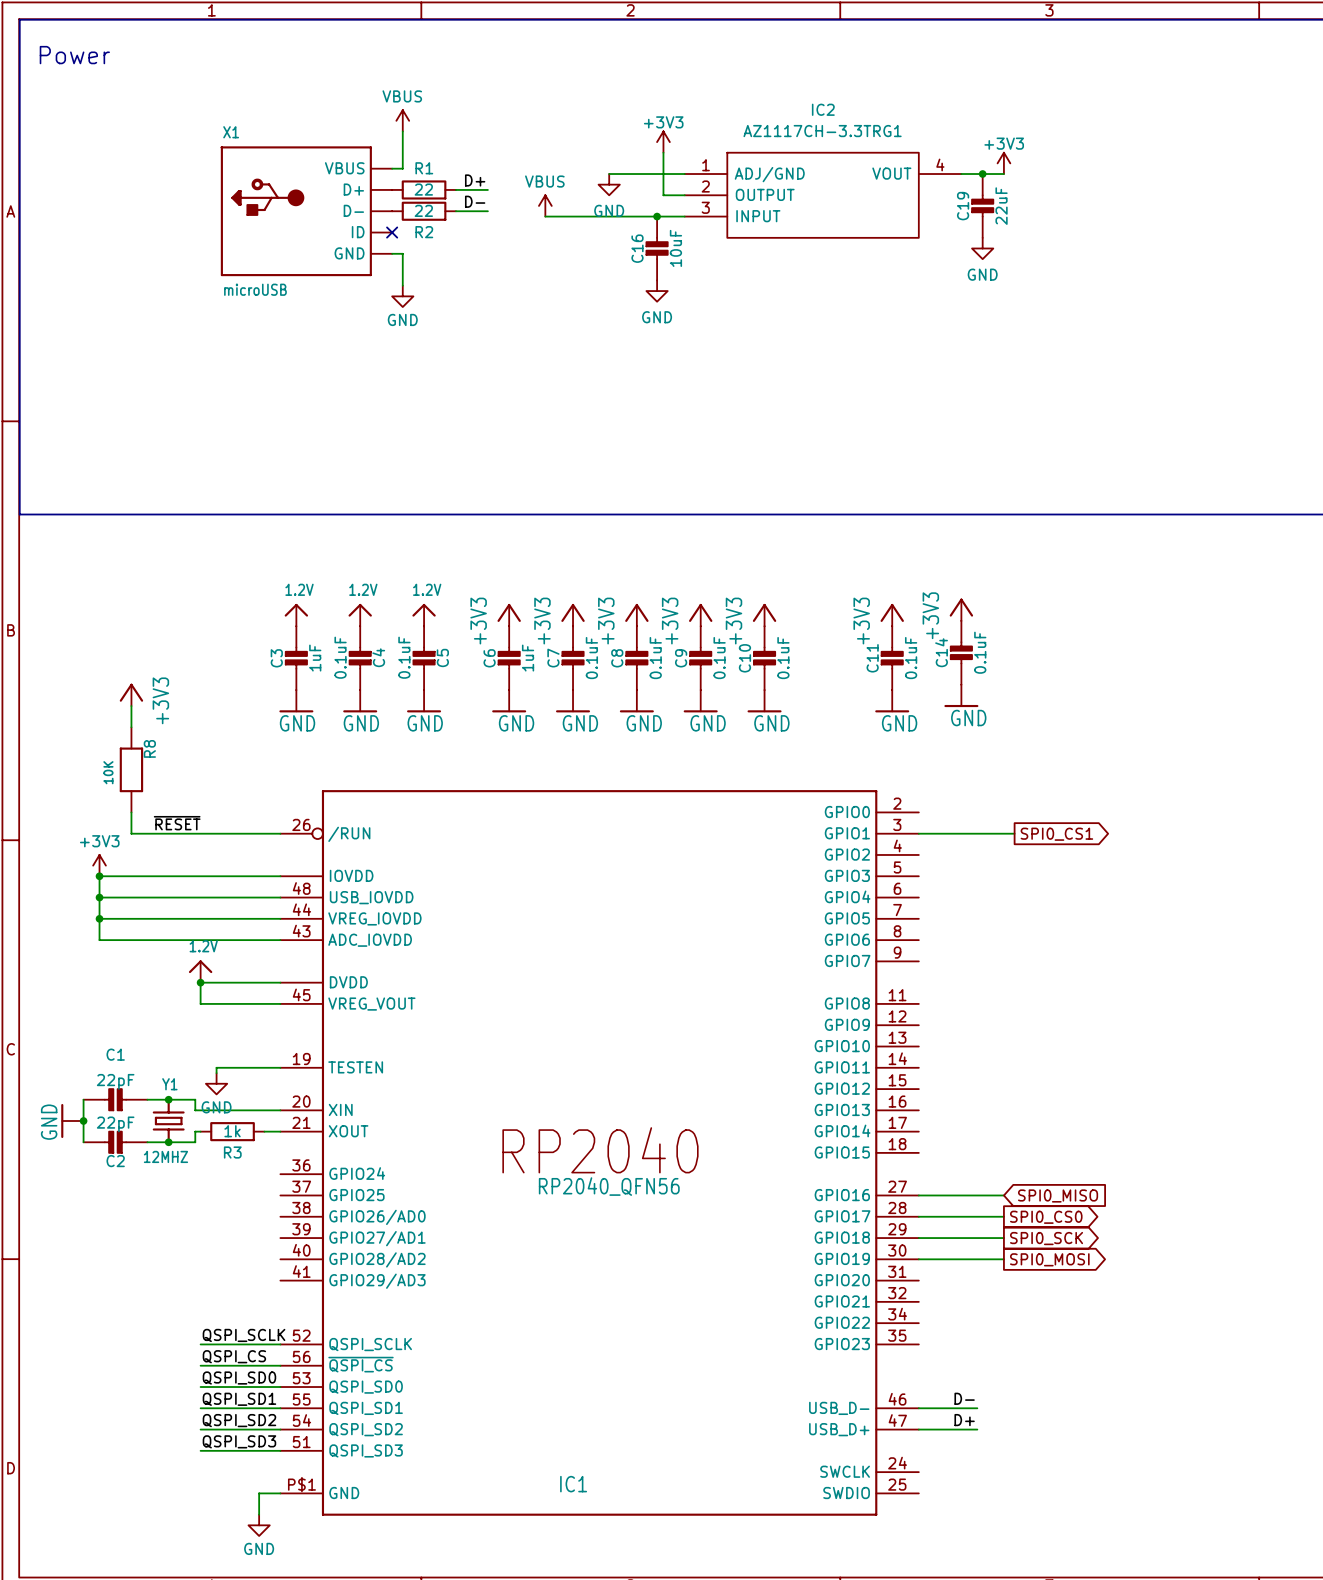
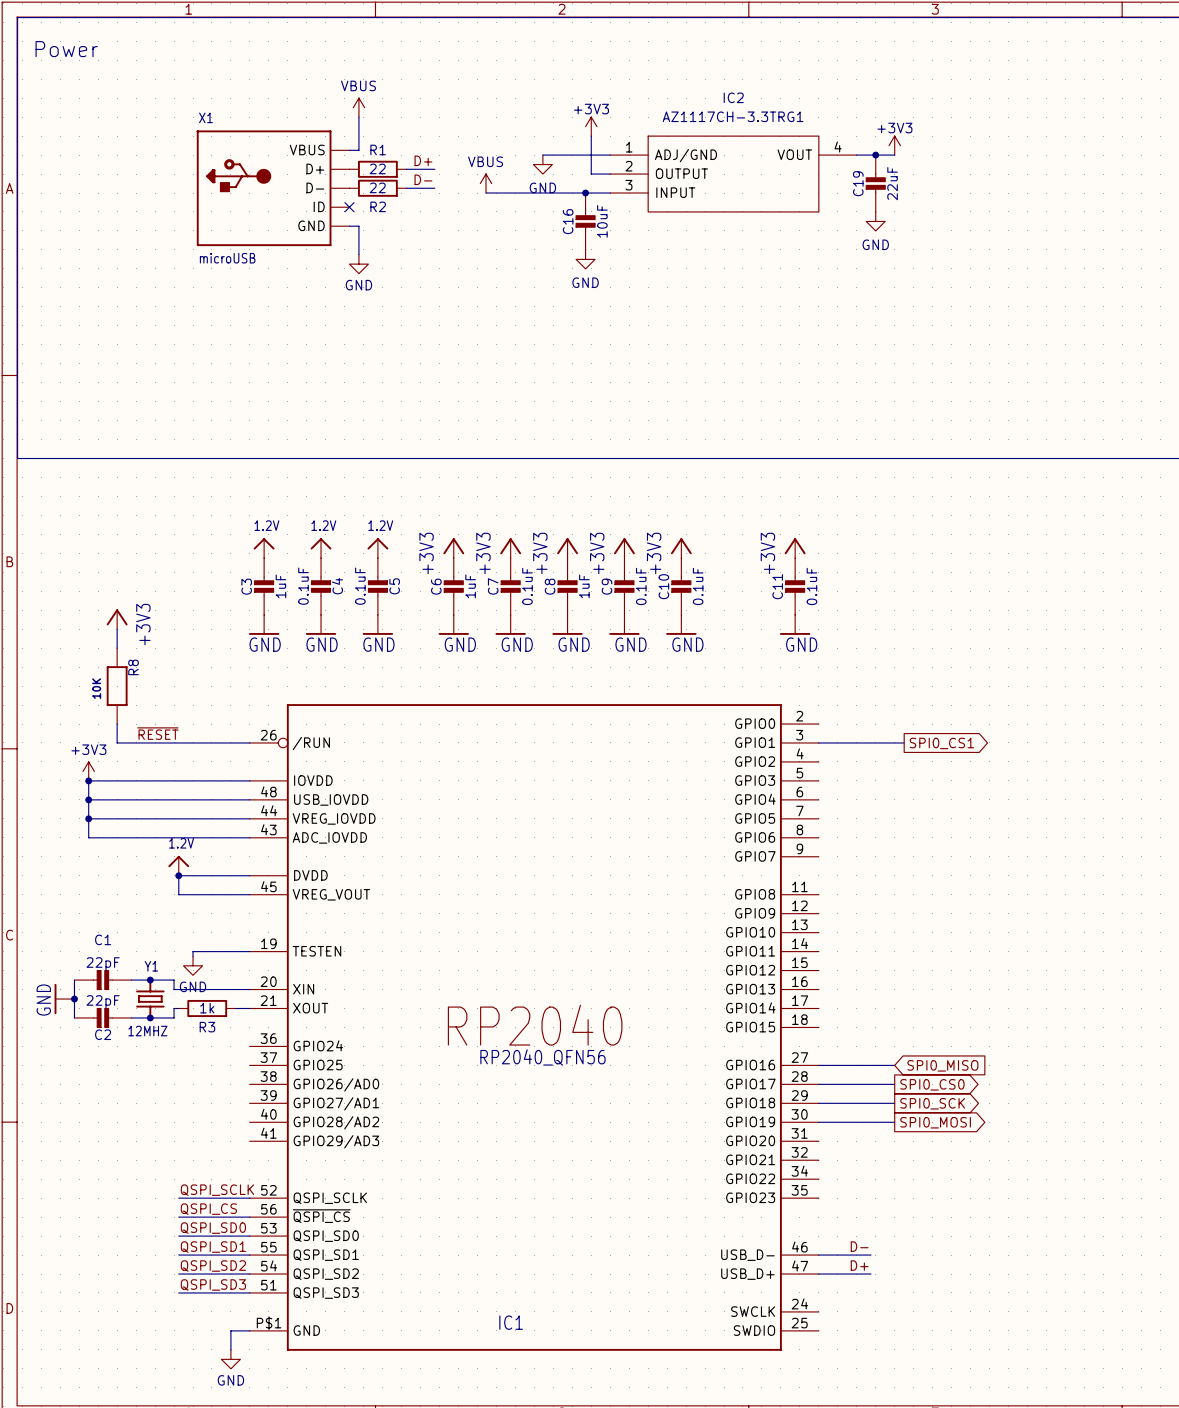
power symbol: +3V3 (961, 609) -> none
C14: 0.1uF (961, 652) -> none
C8 value: 0.1uF (655, 658) -> 1uF (584, 586)
power symbol: GND (961, 695) -> none

